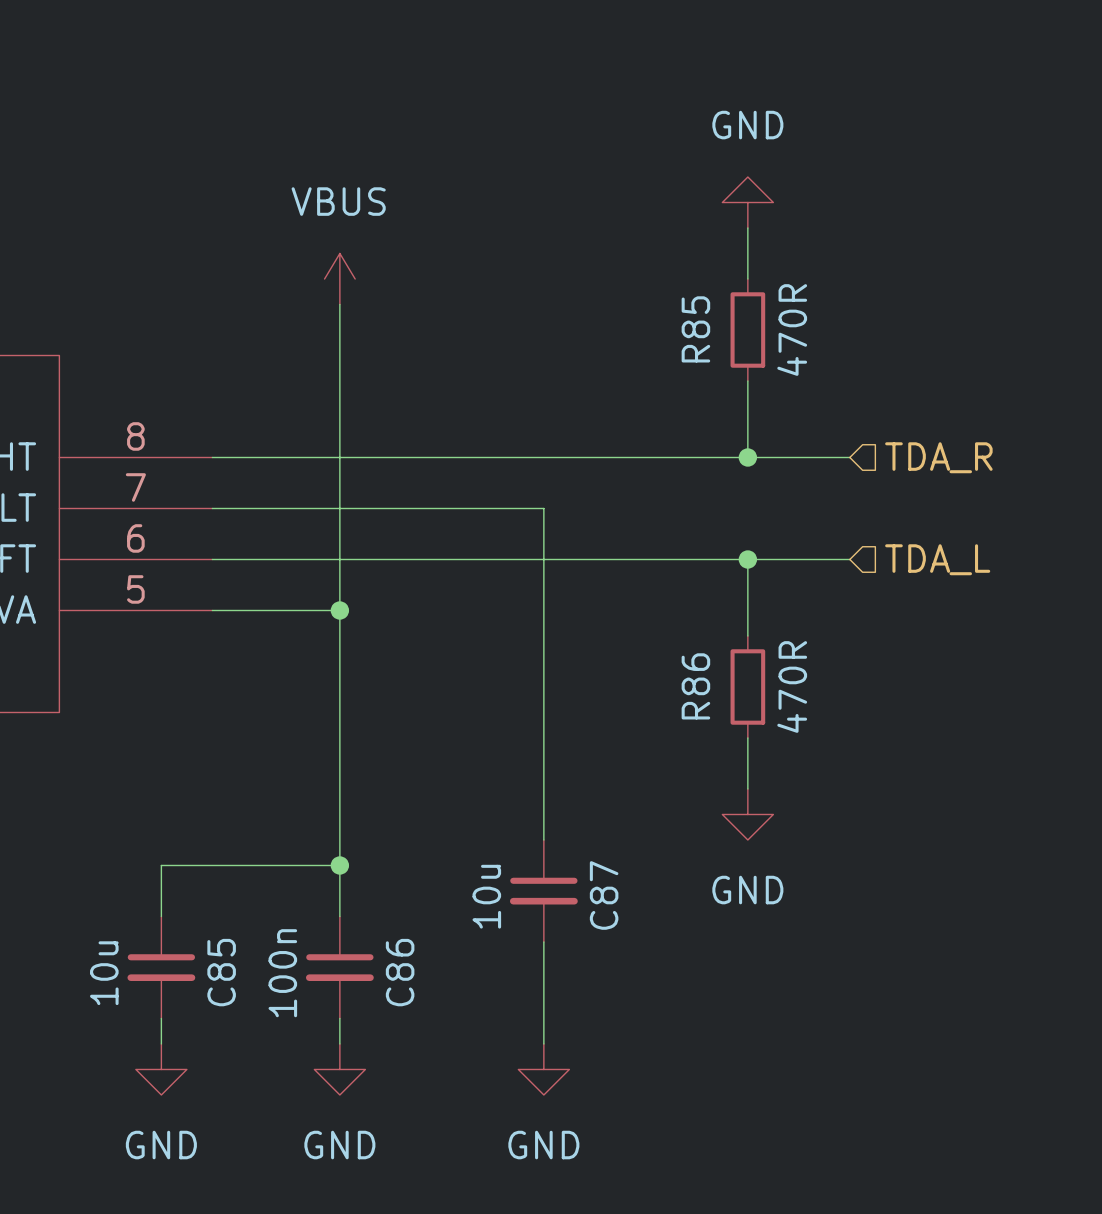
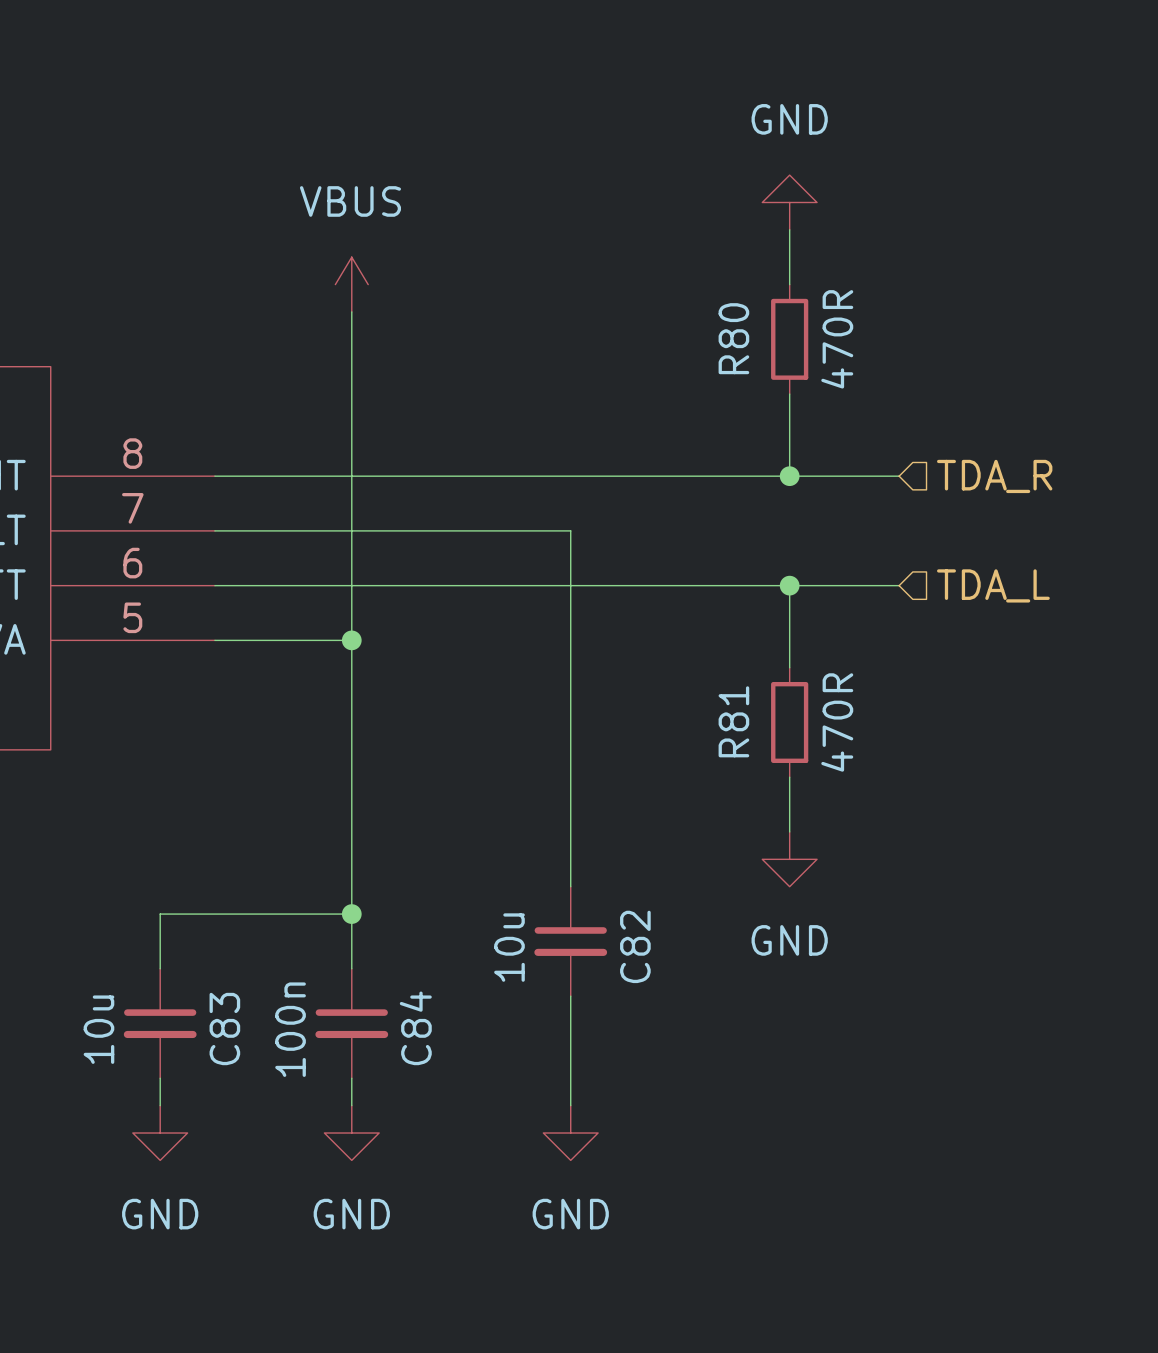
R85 name: R85 (695, 329) -> R80 (733, 338)
R86 name: R86 (695, 686) -> R81 (733, 721)
C87 name: C87 (604, 895) -> C82 (635, 946)
C85 name: C85 (221, 972) -> C83 (224, 1029)
C86 name: C86 (400, 972) -> C84 (415, 1028)

